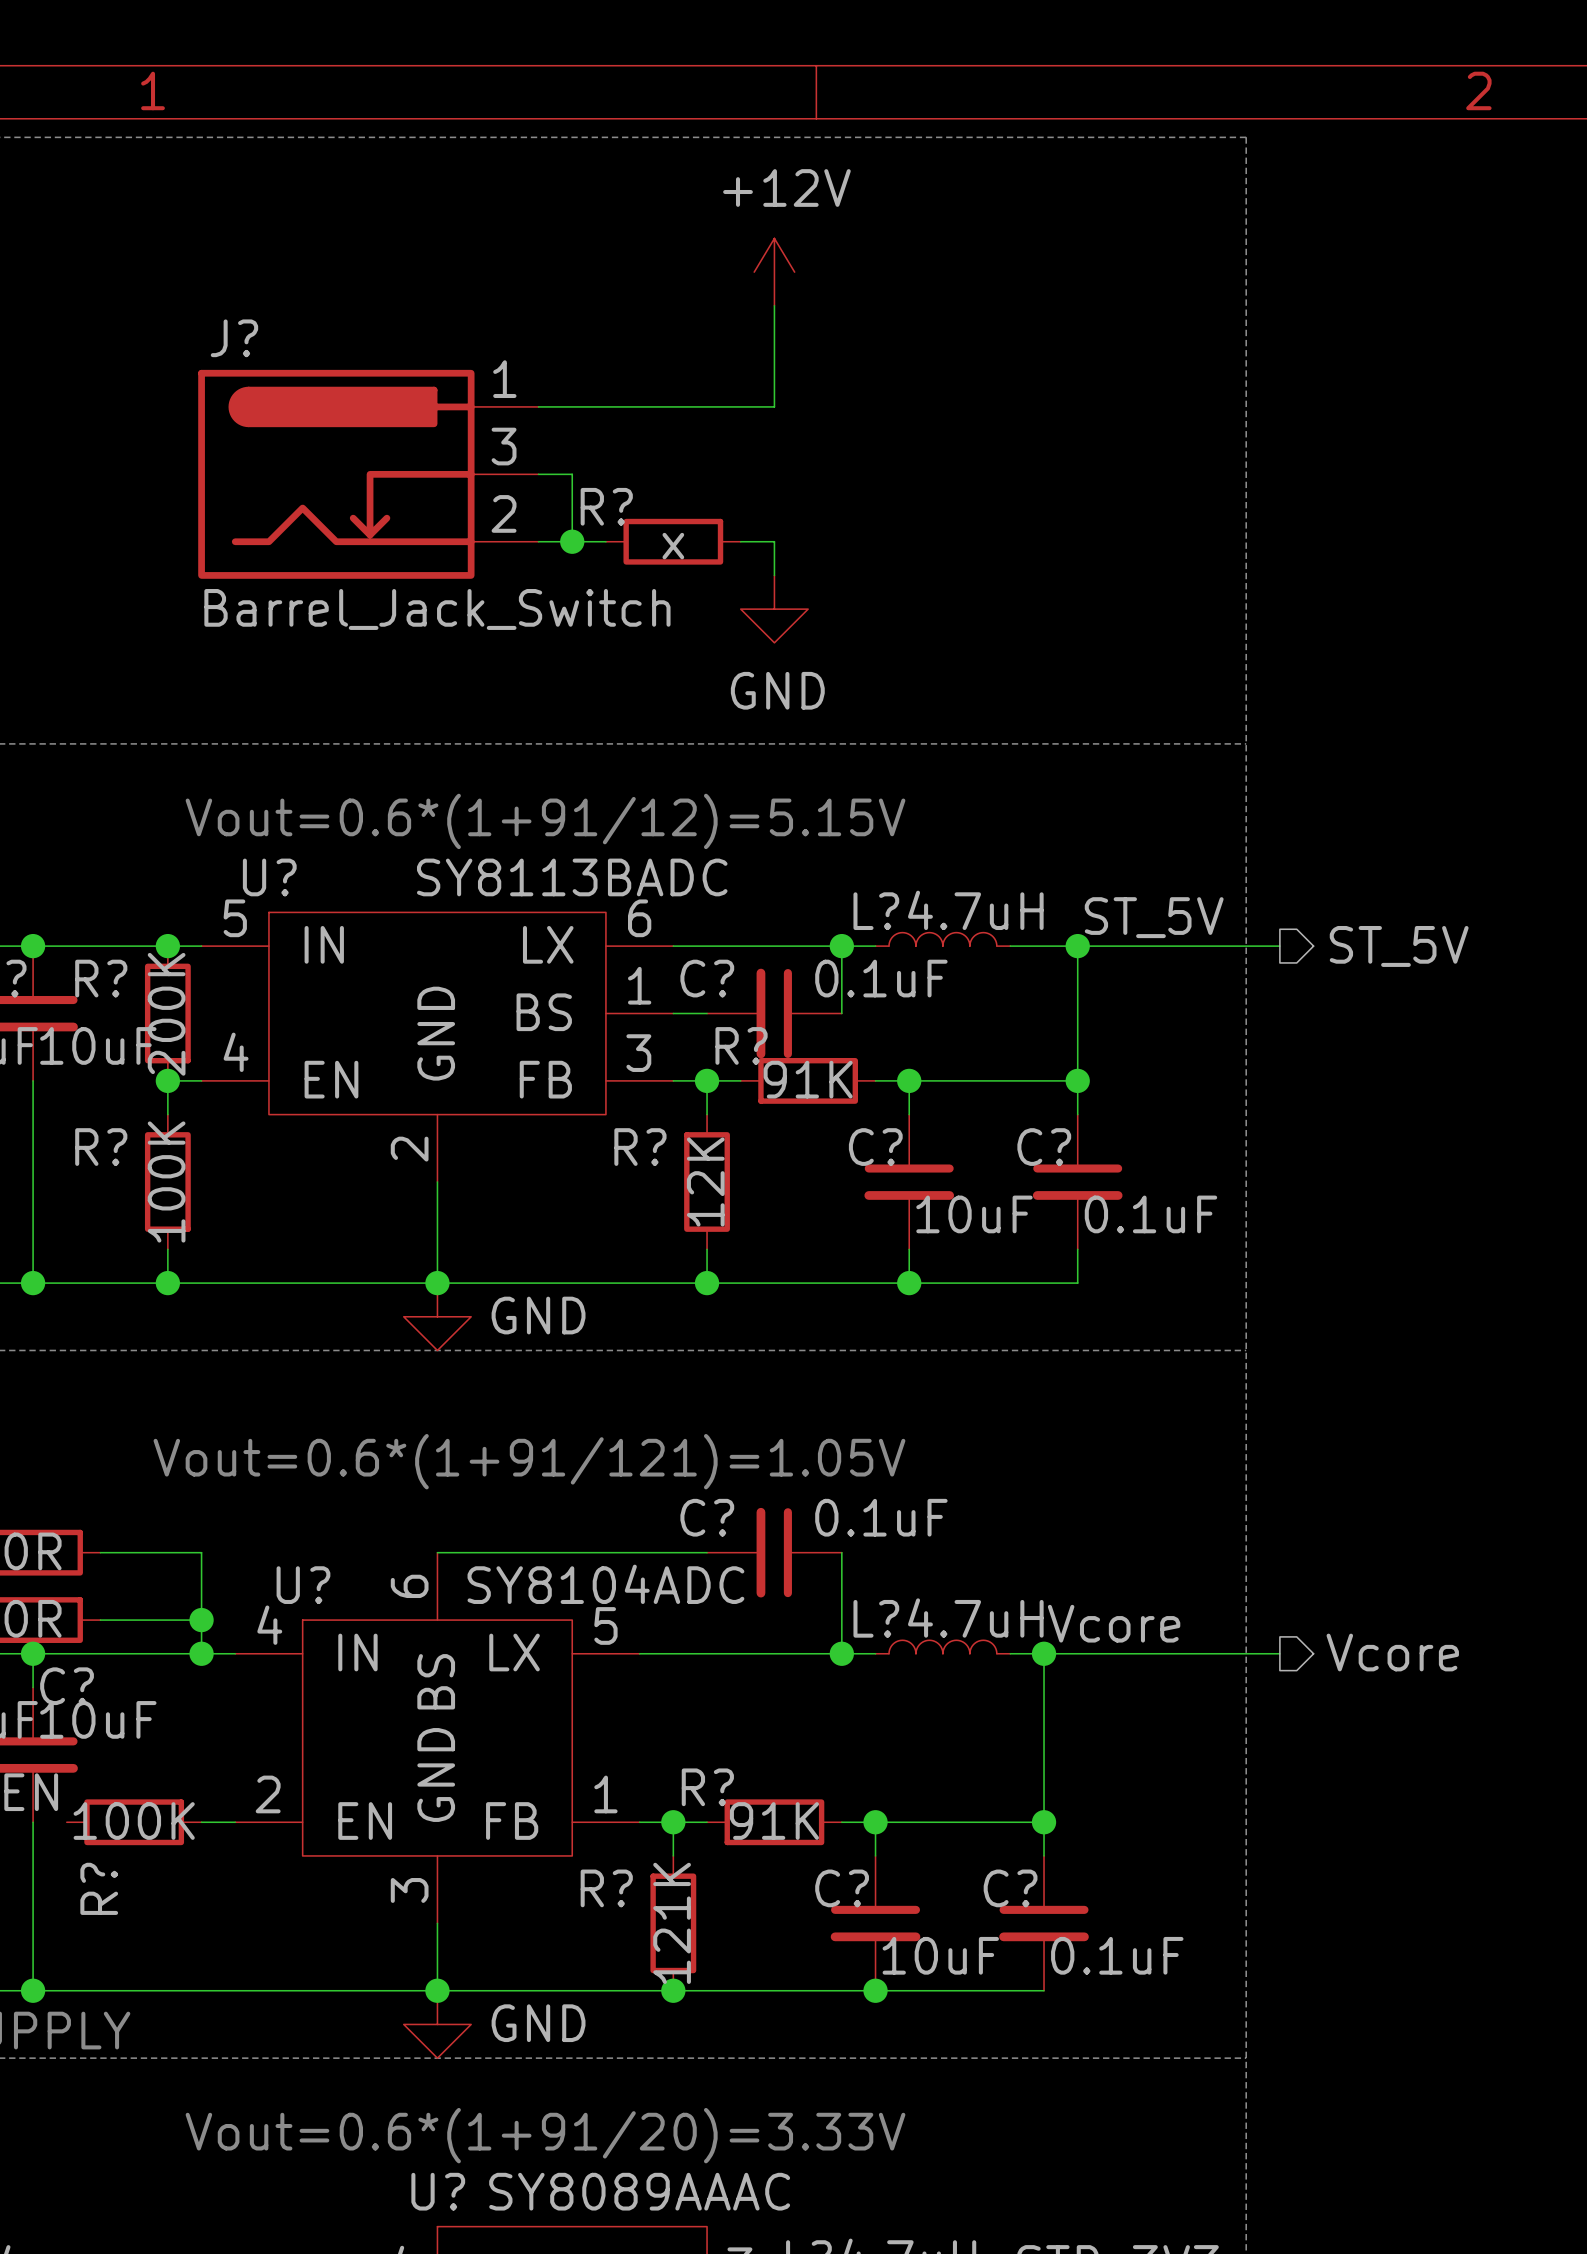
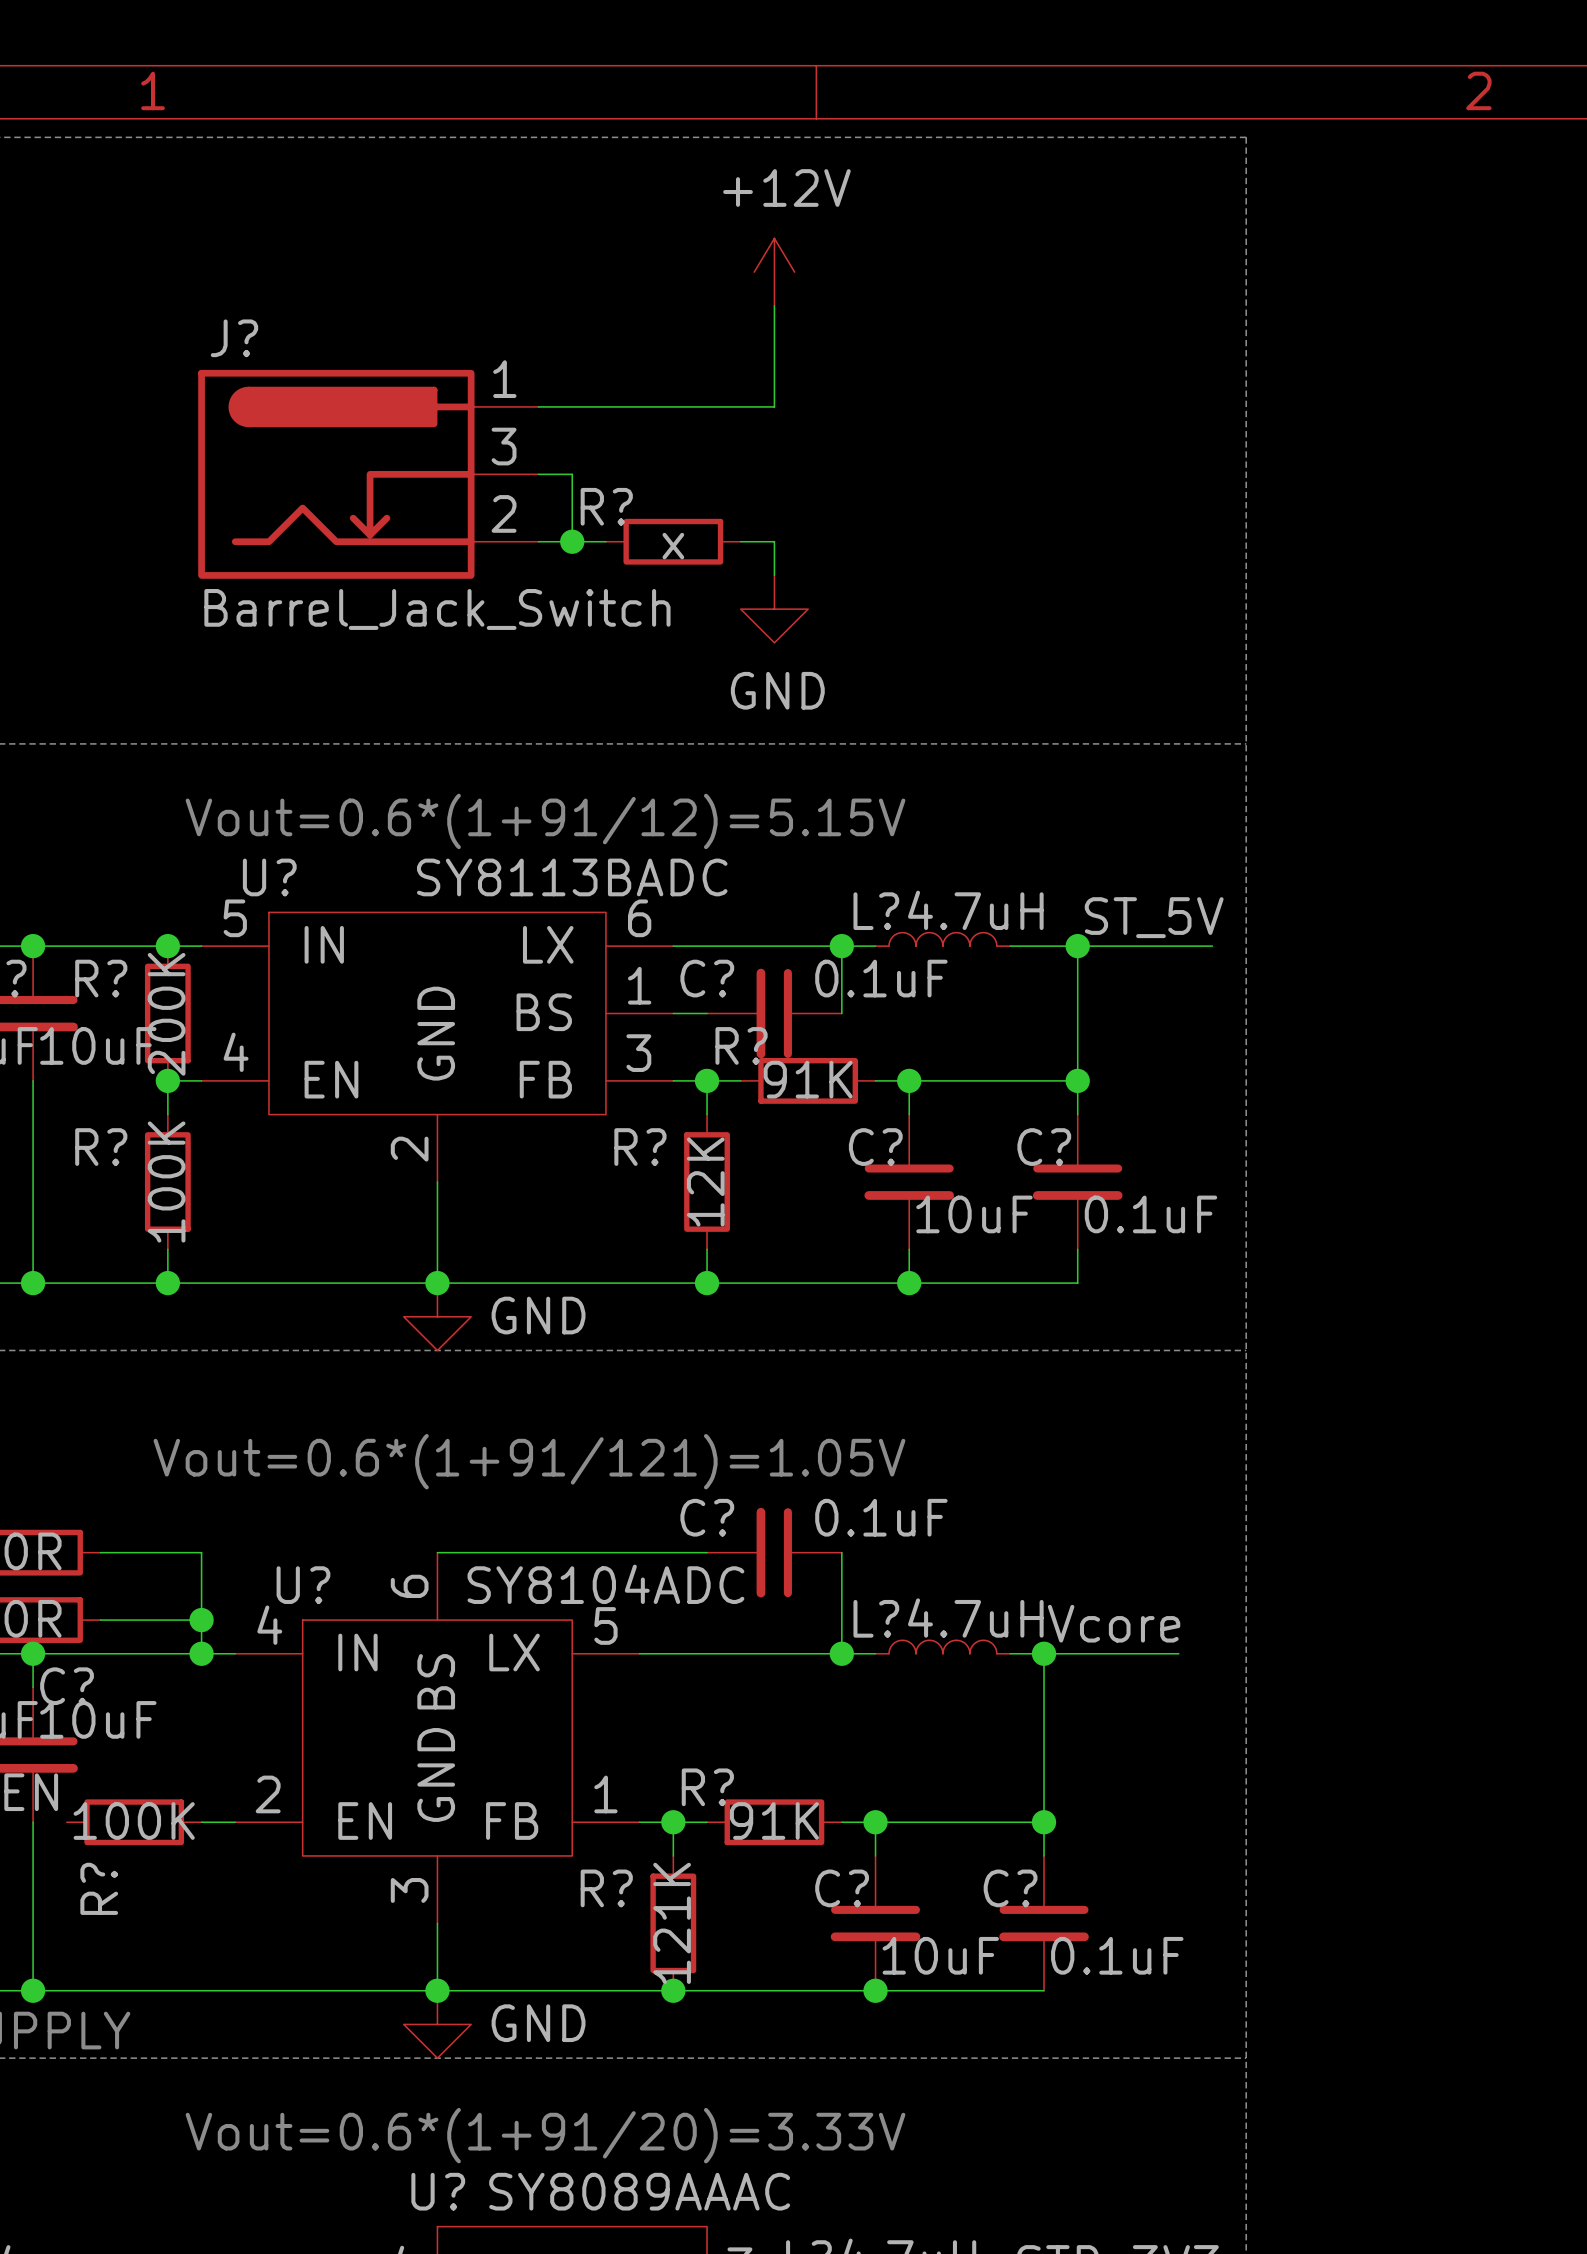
wire: (1212, 946) (1279, 946) -> none
hierarchical label: ST_5V (1399, 946) -> none
hierarchical label: Vcore (1392, 1652) -> none
wire: (1178, 1653) (1279, 1653) -> none

